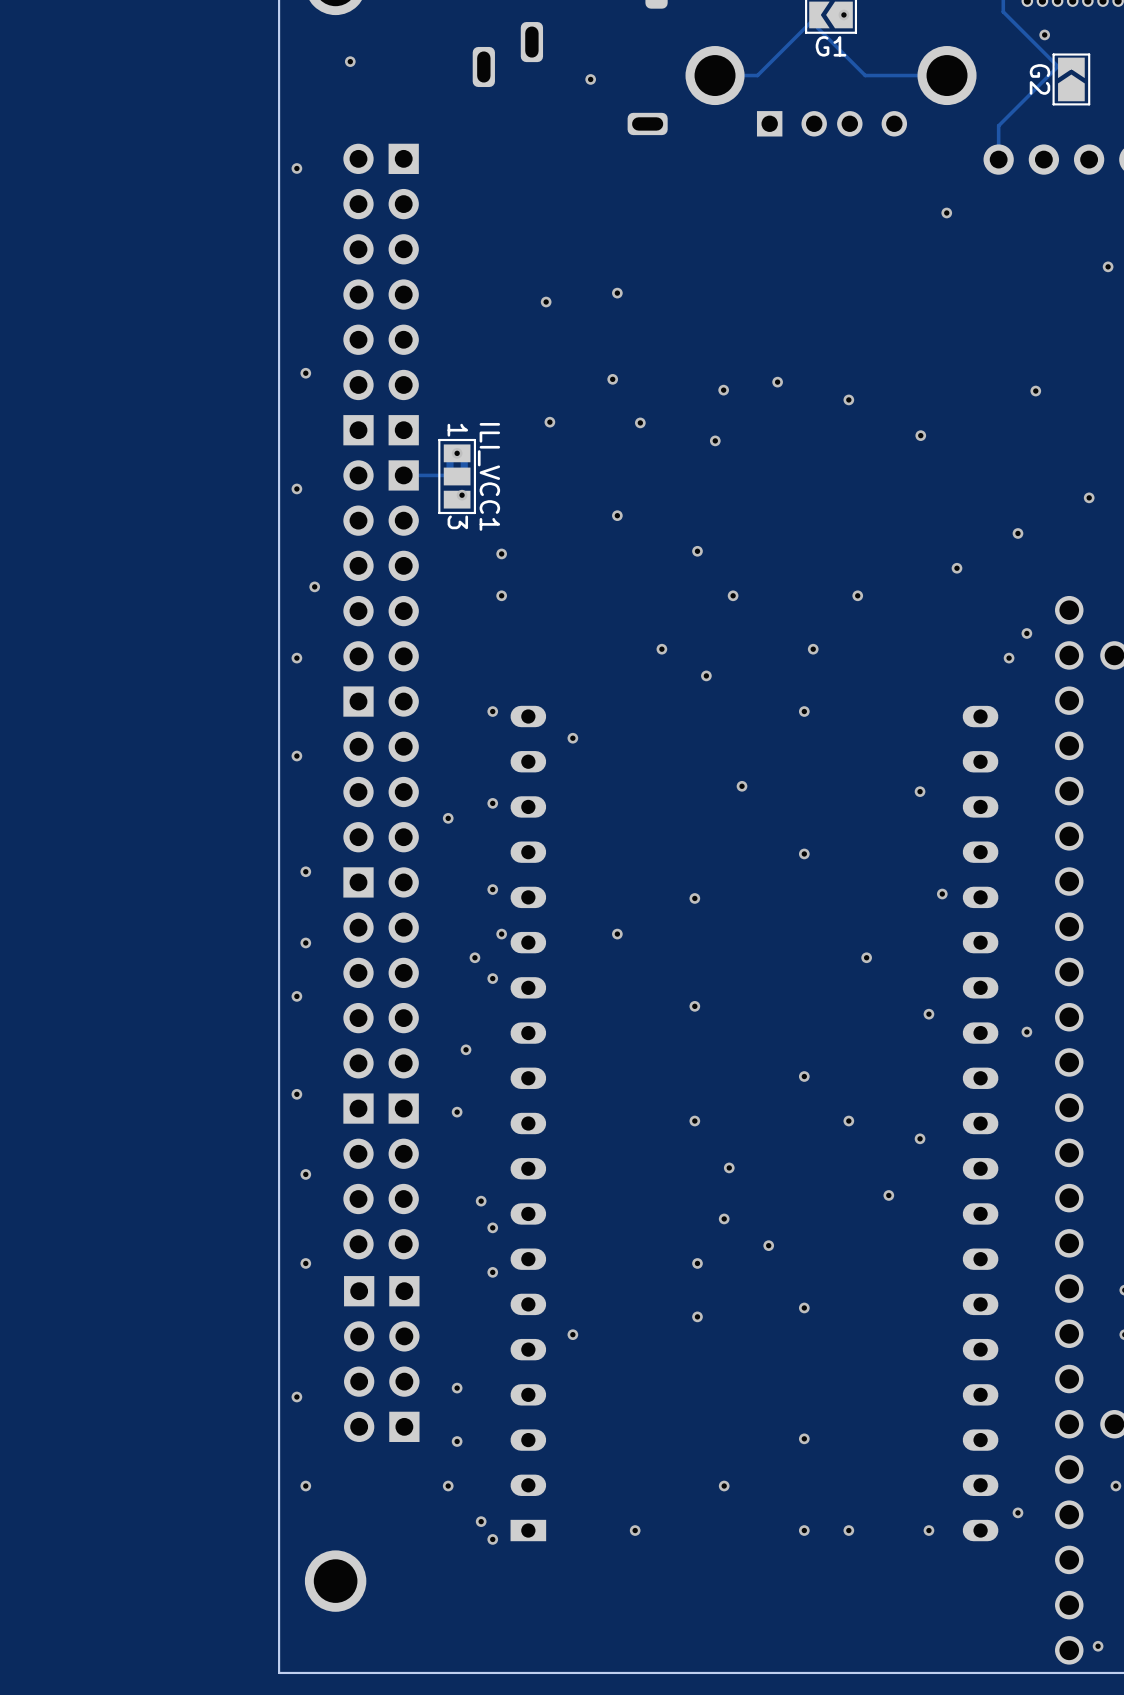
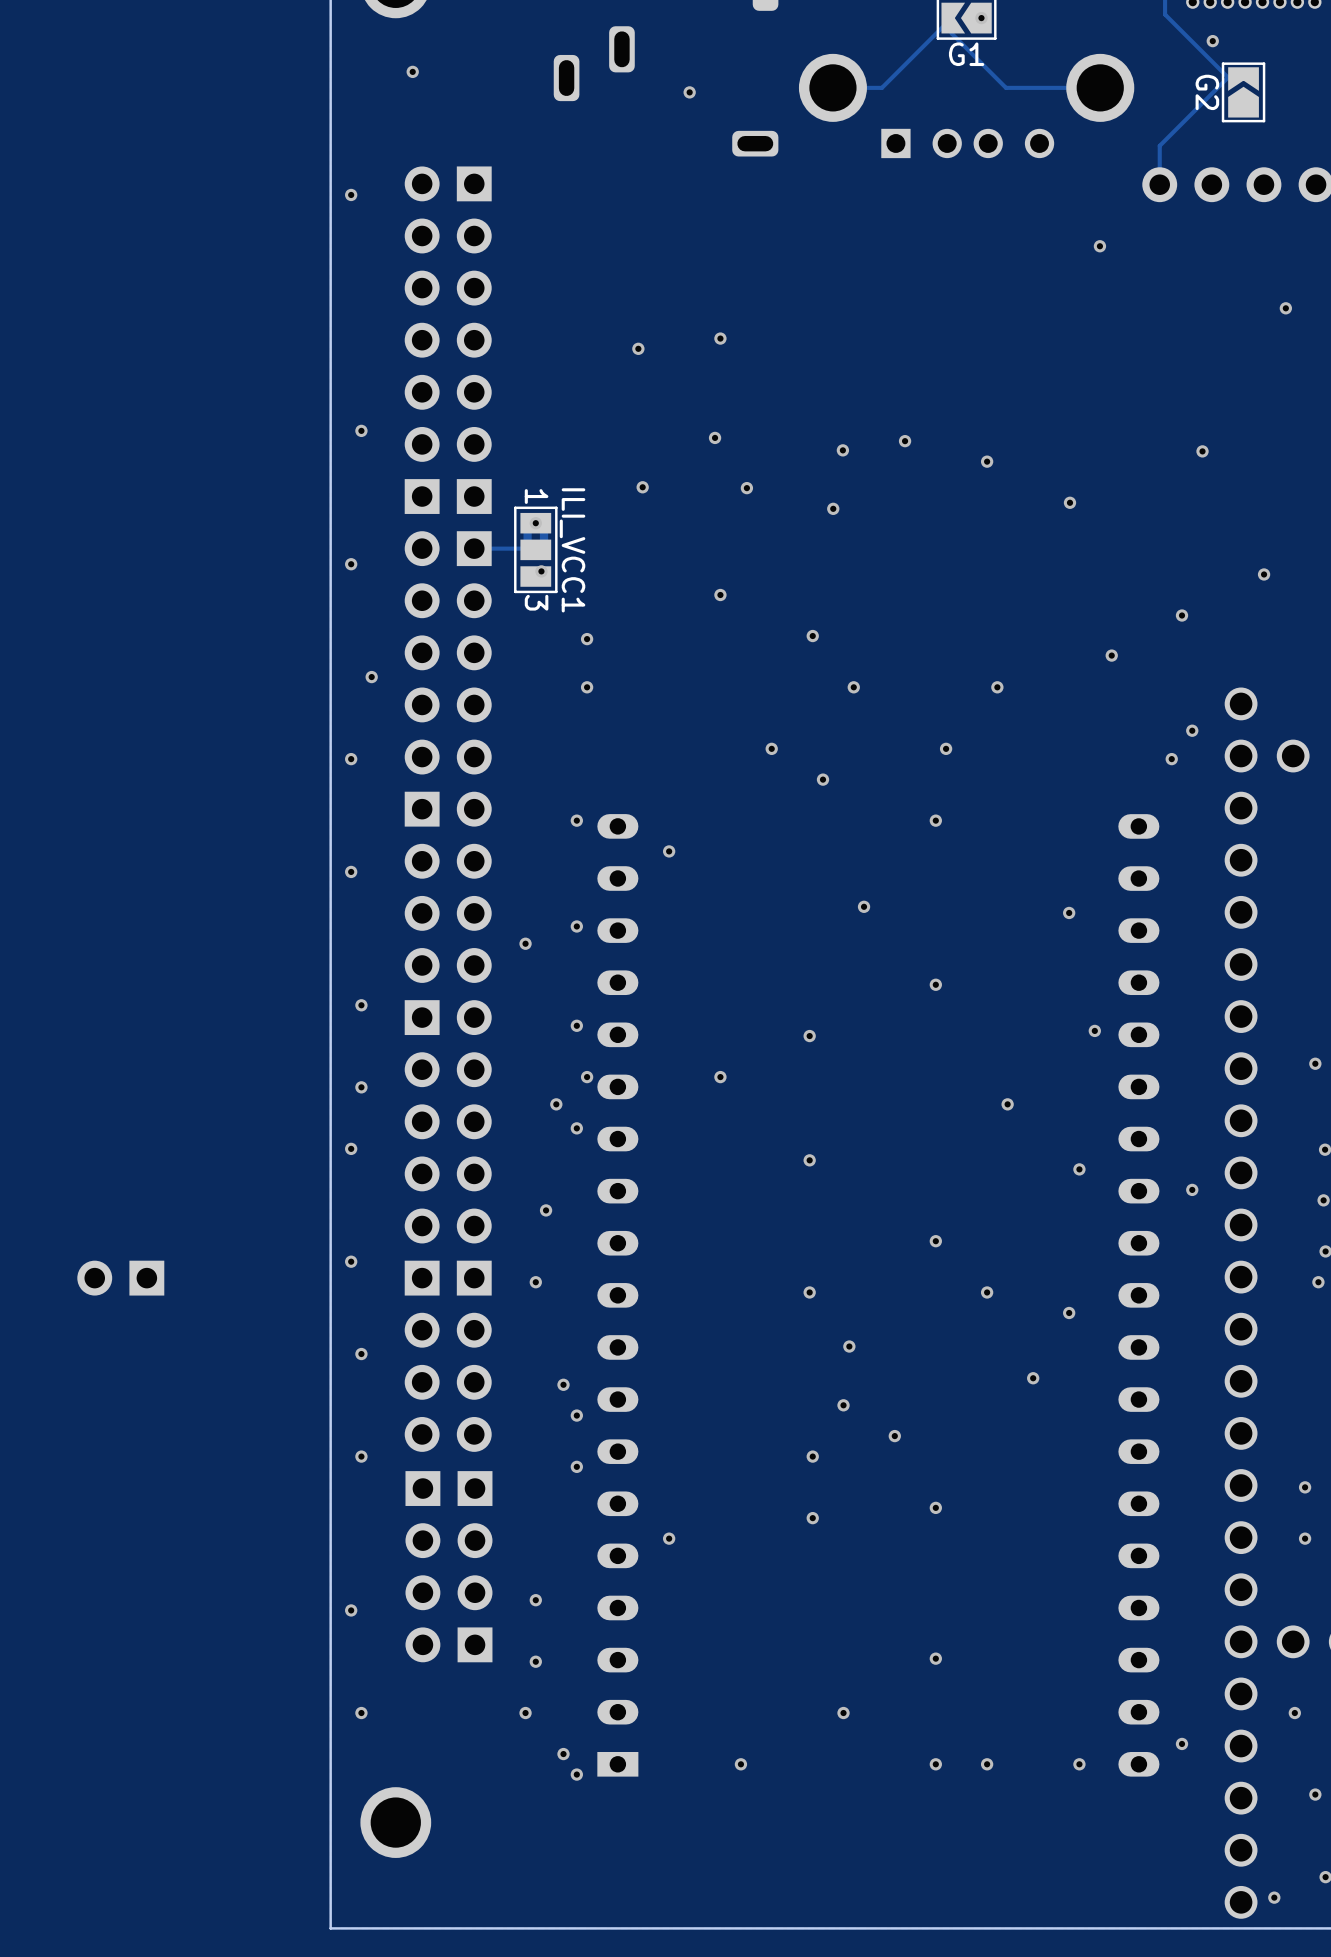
part: none -> (120, 1278)

